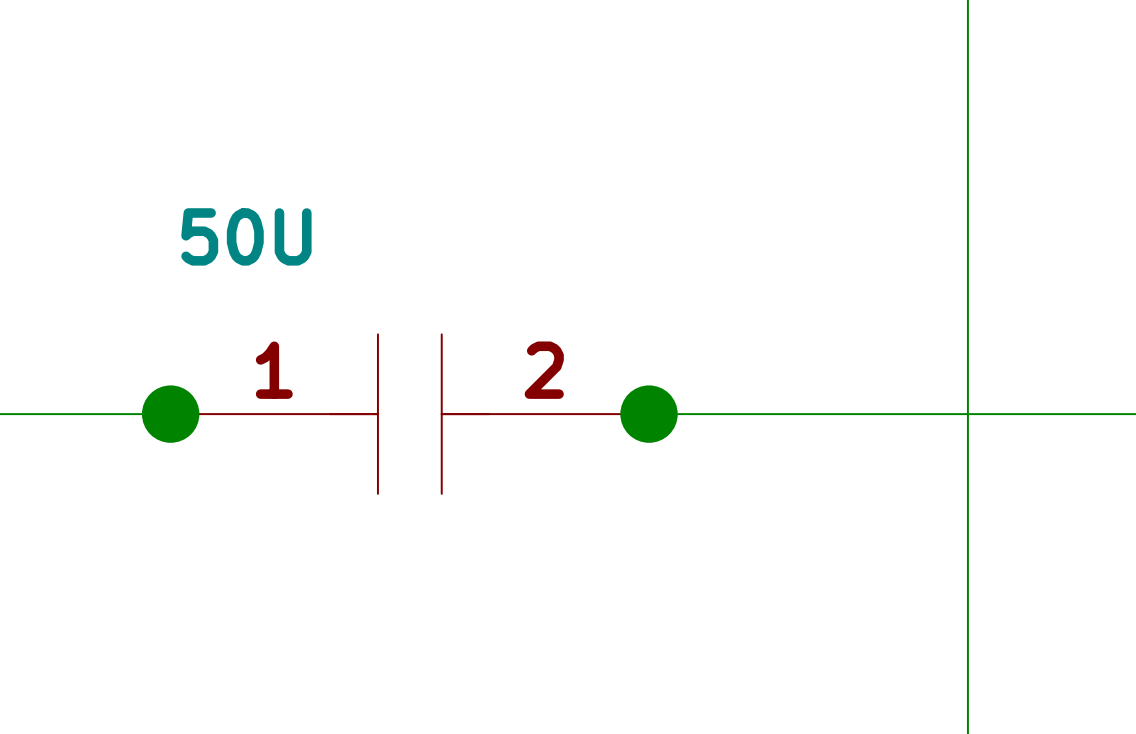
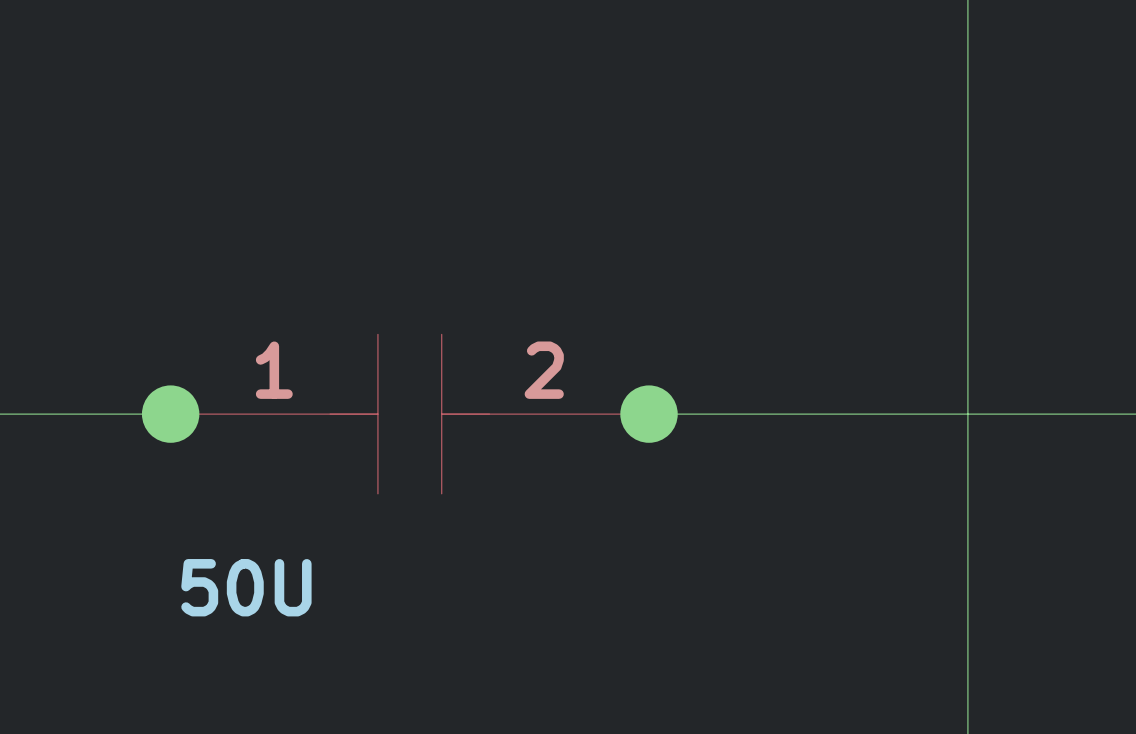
part value position: 50U (246, 236) -> 50U (246, 587)

